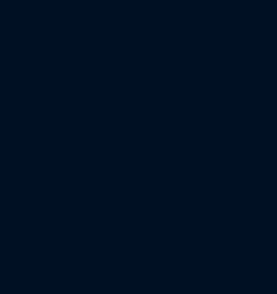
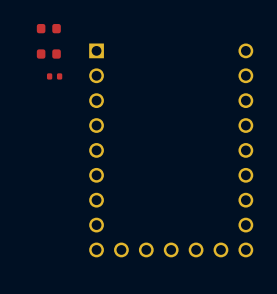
part: none -> (48, 28)
part: none -> (48, 54)
part: none -> (54, 76)
part: none -> (171, 150)

